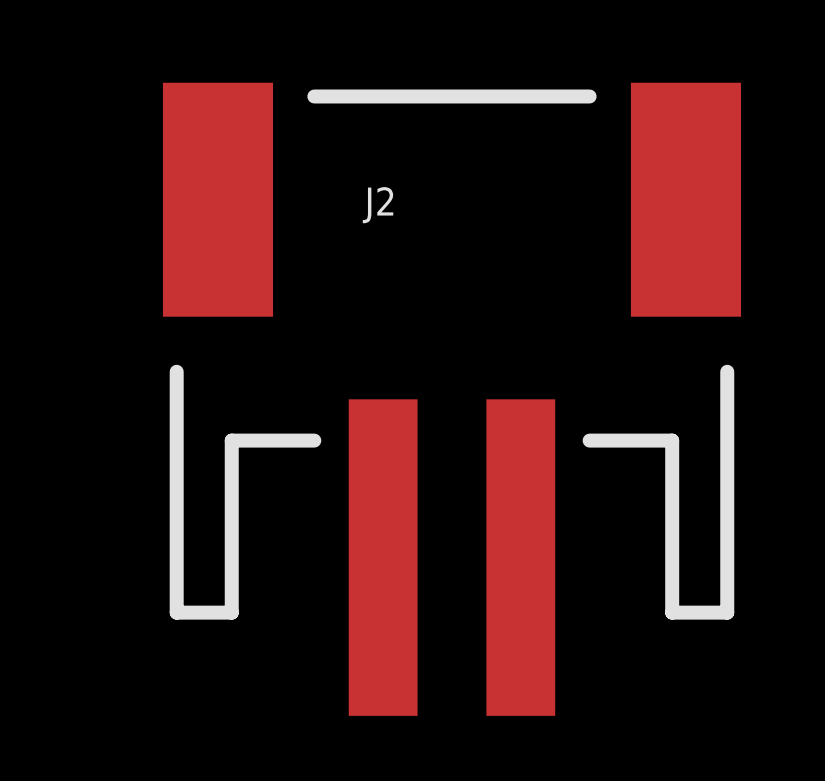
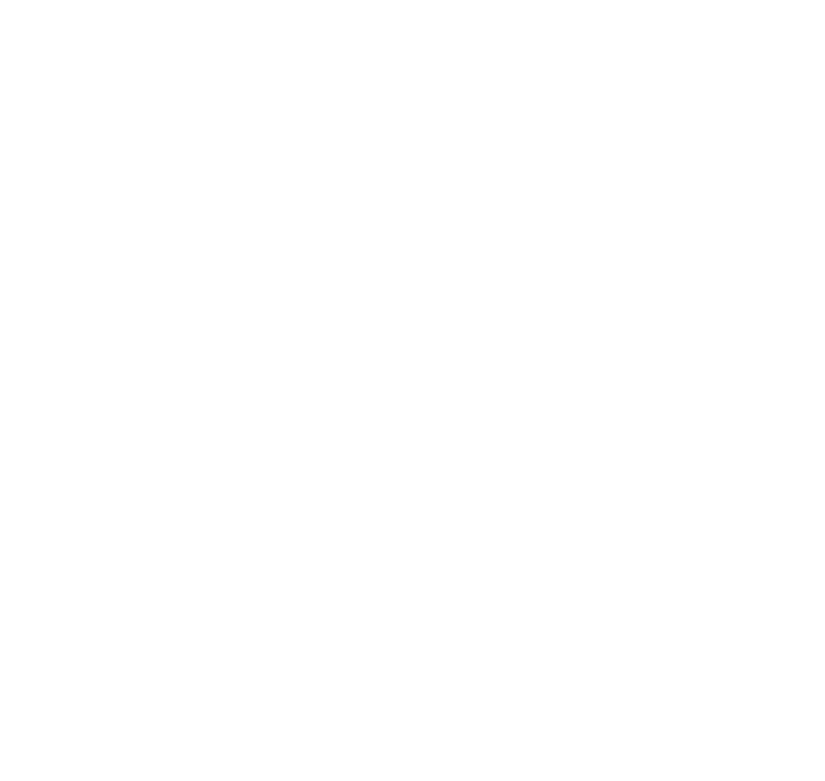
J2: (451, 399) -> none

